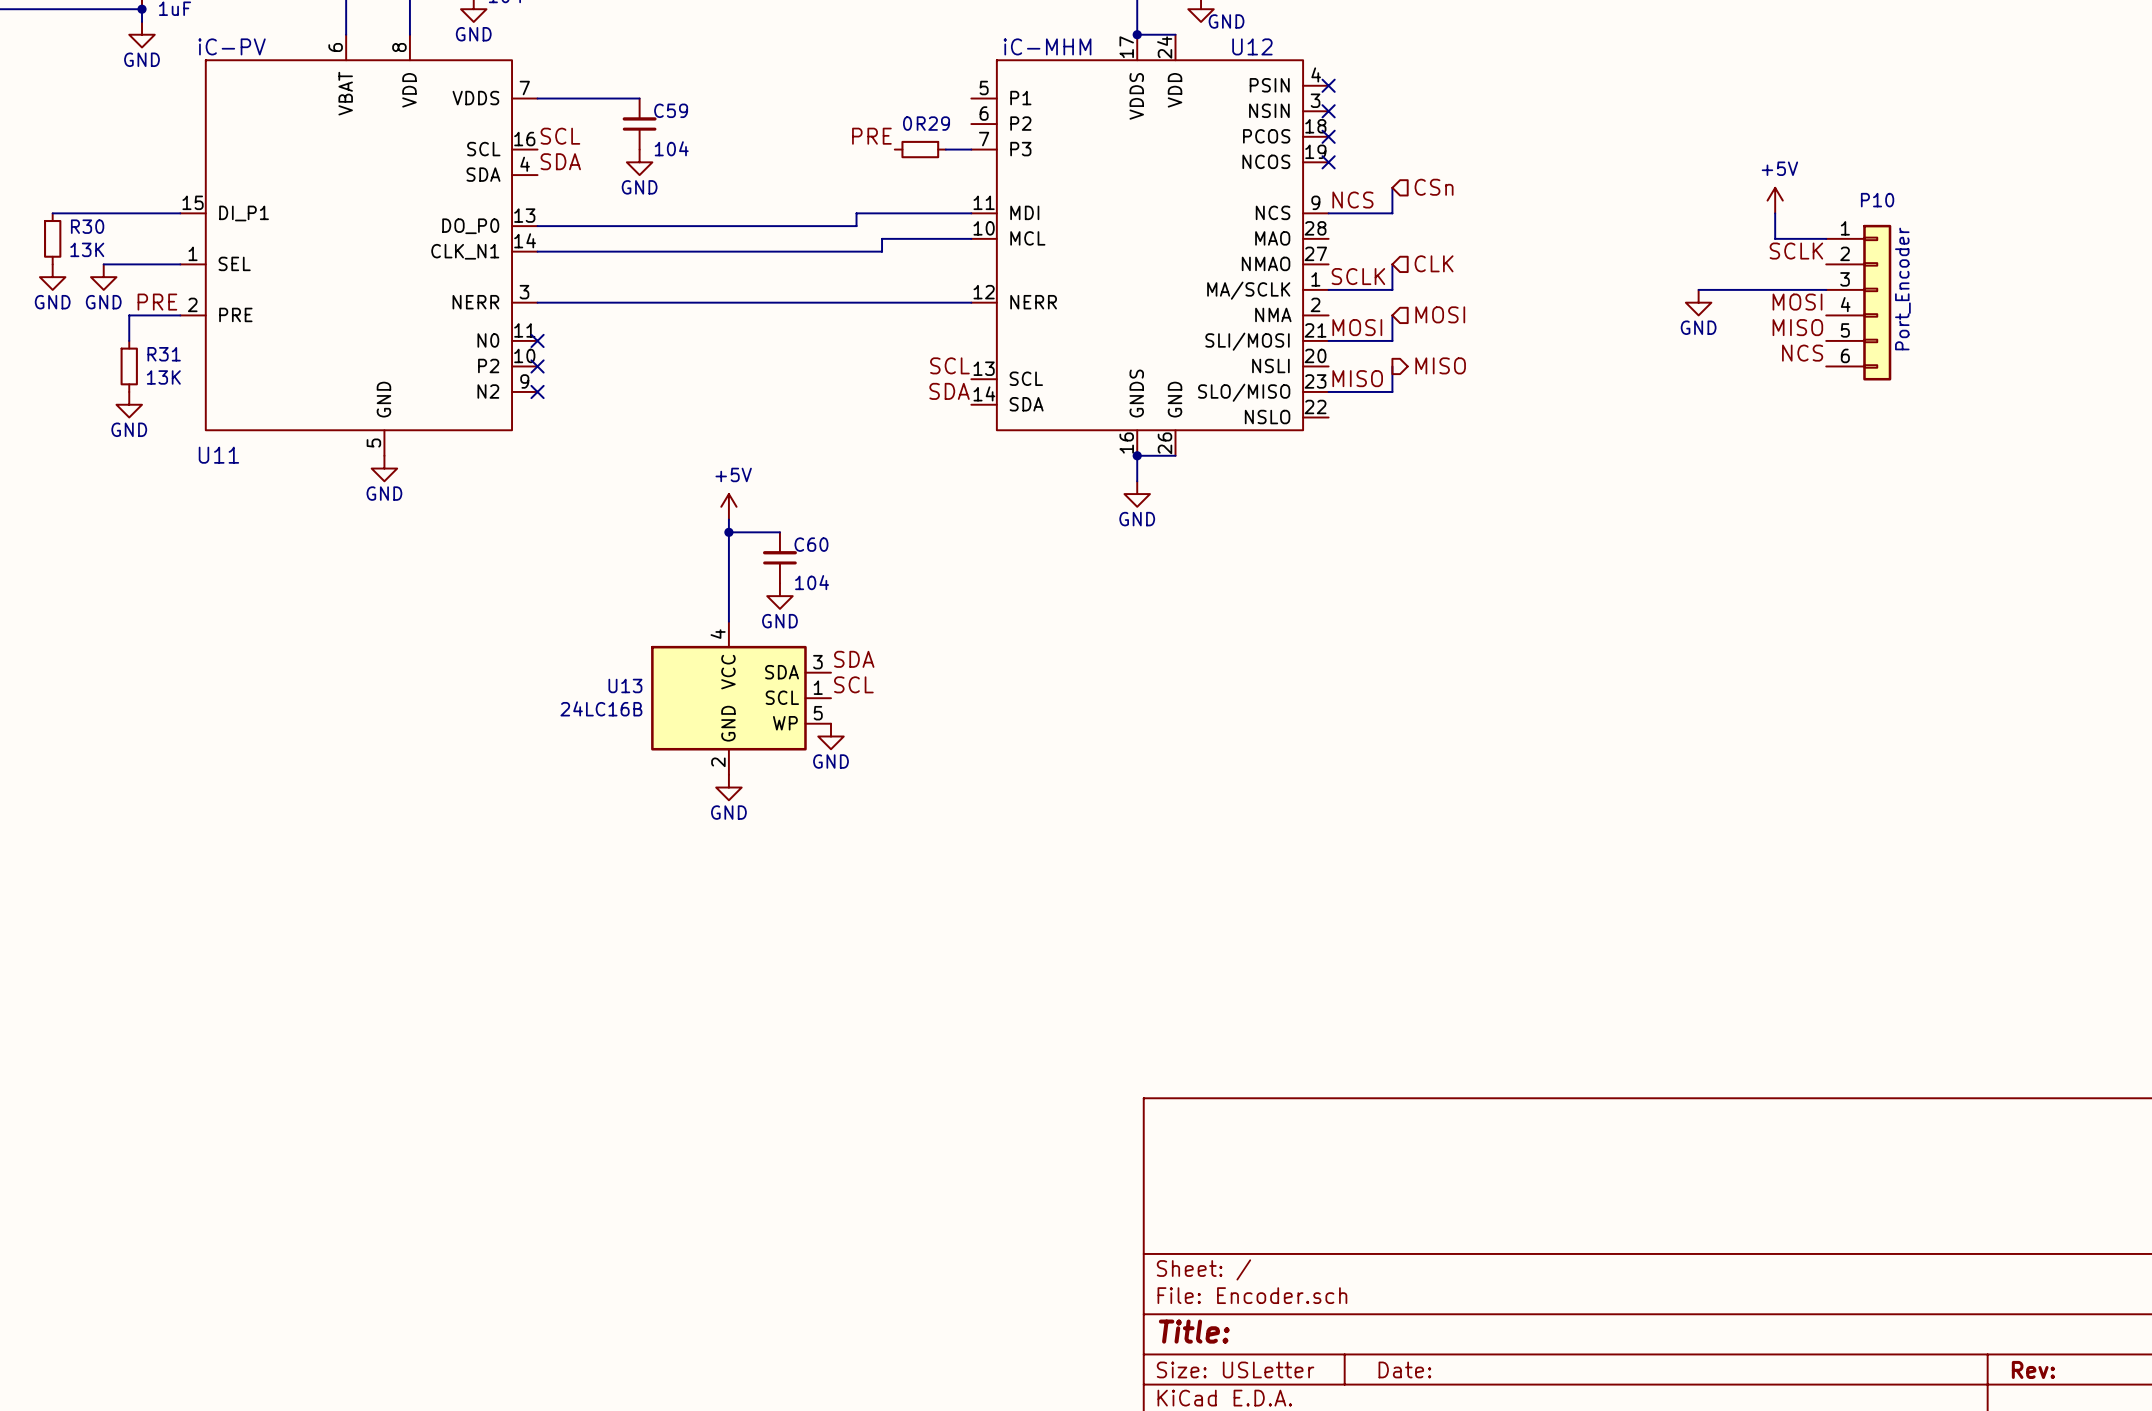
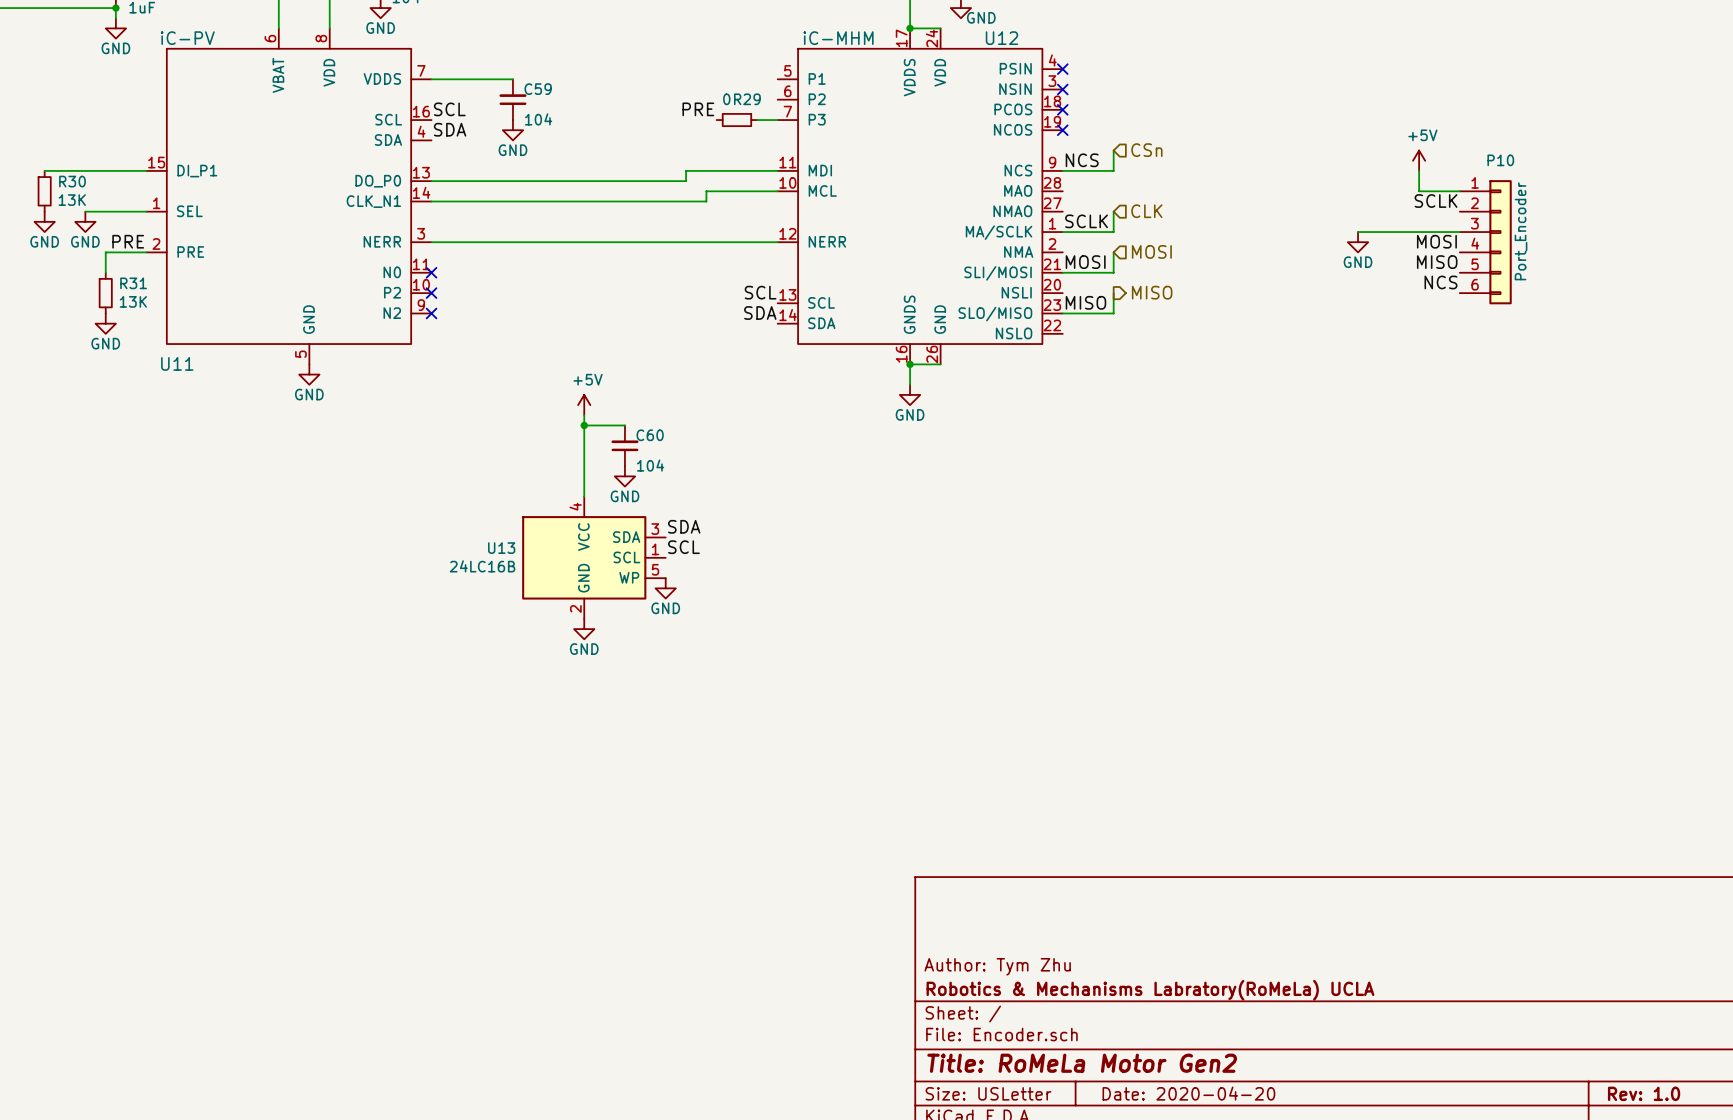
title block: none -> Author: Tym Zhu (997, 966)
title block: none -> Robotics & Mechanisms Labratory(RoMeLa) UCLA (1150, 990)
title block: Title: (1194, 1331) -> Title: RoMeLa Motor Gen2 (1082, 1063)
title block: Date: (1404, 1369) -> Date: 2020-04-20 (1188, 1093)
title block: Rev: (2033, 1369) -> Rev: 1.0 (1644, 1093)

